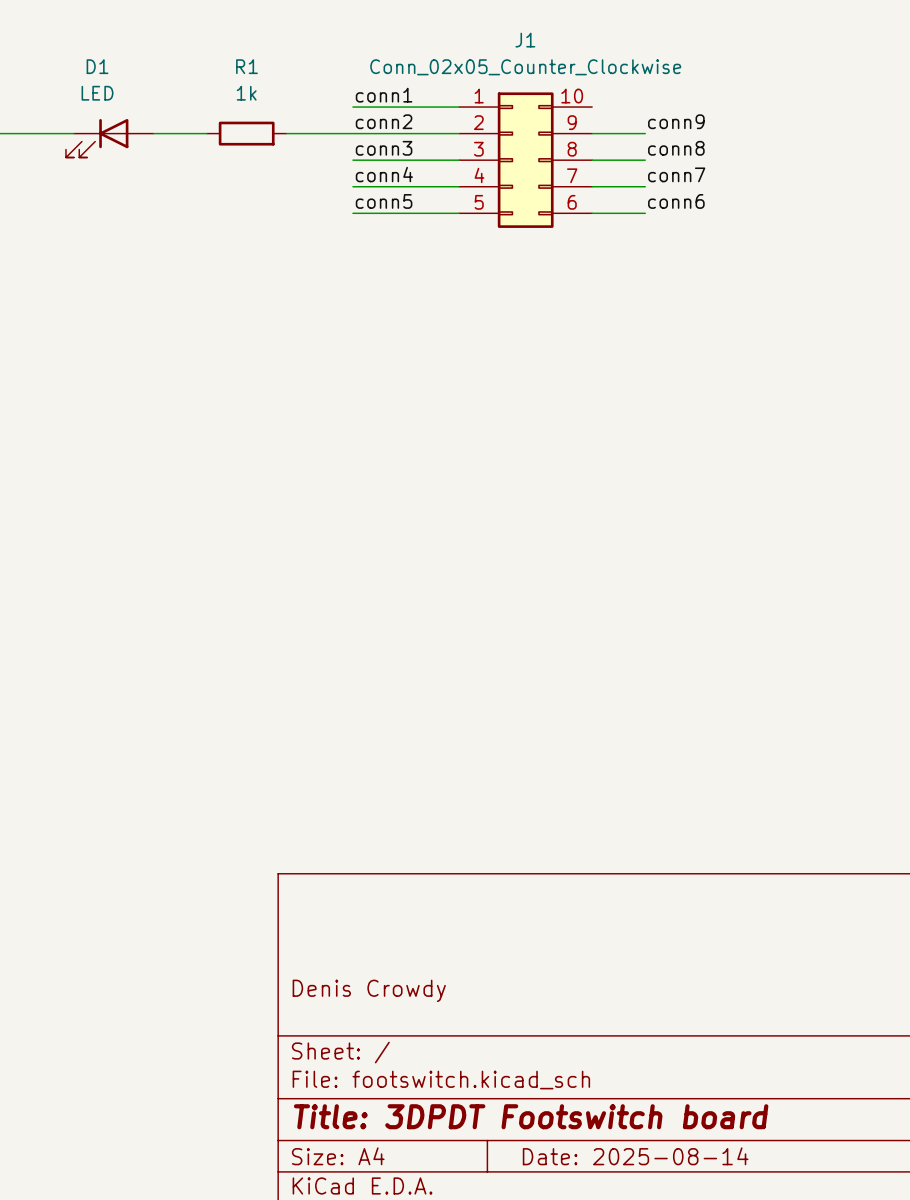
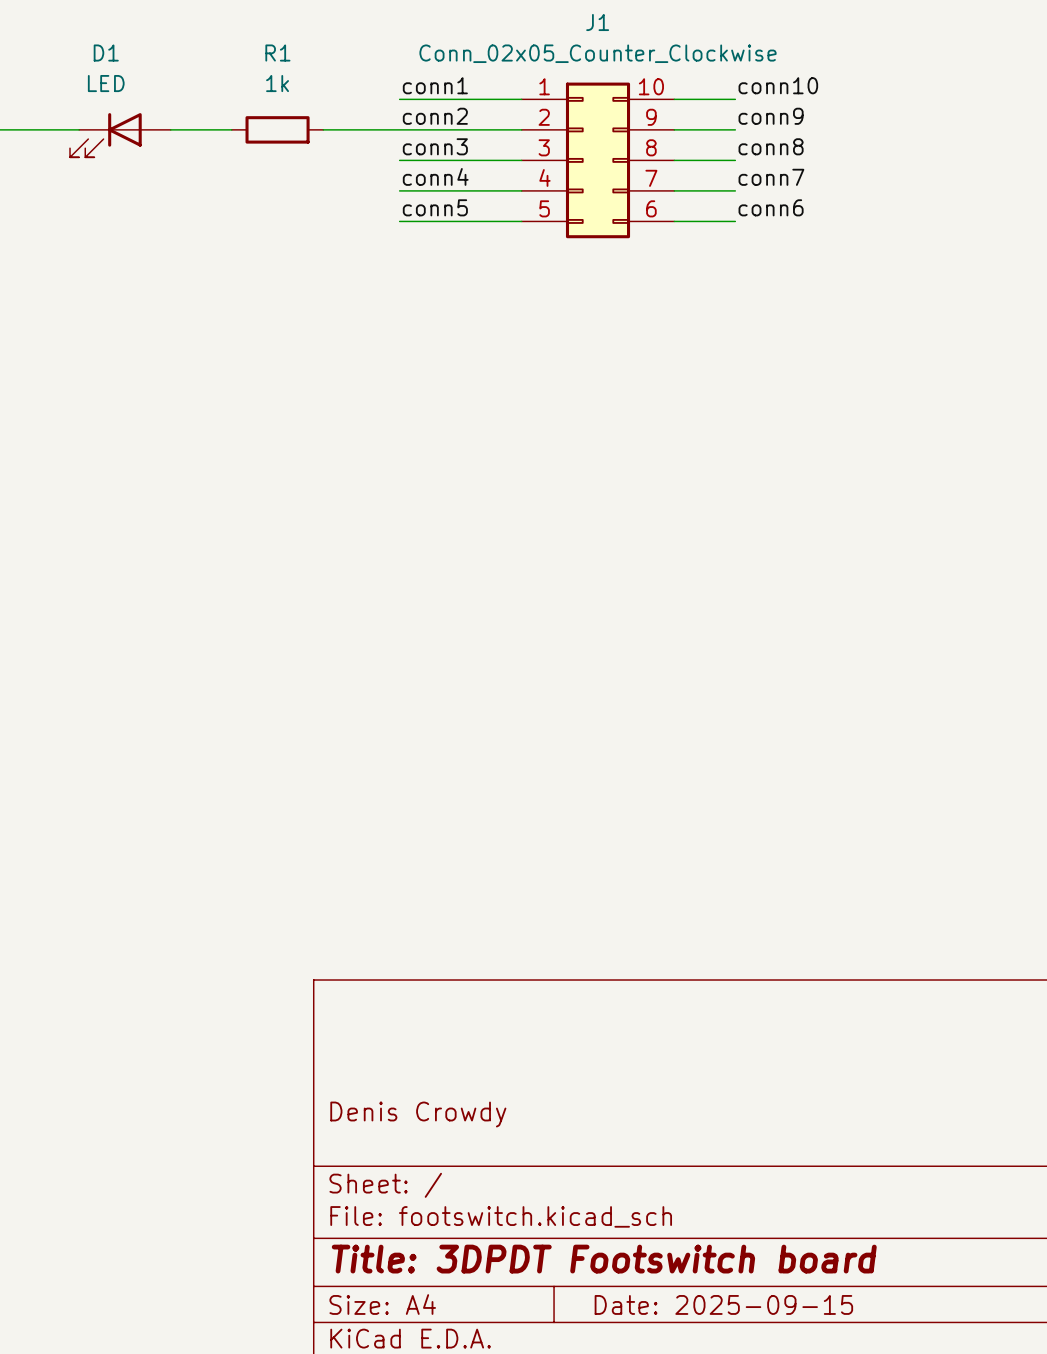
label: none -> conn10 (778, 85)
wire: none -> (674, 99) (735, 99)
title block: Date: 2025-08-14 (635, 1156) -> Date: 2025-09-15 (723, 1304)

